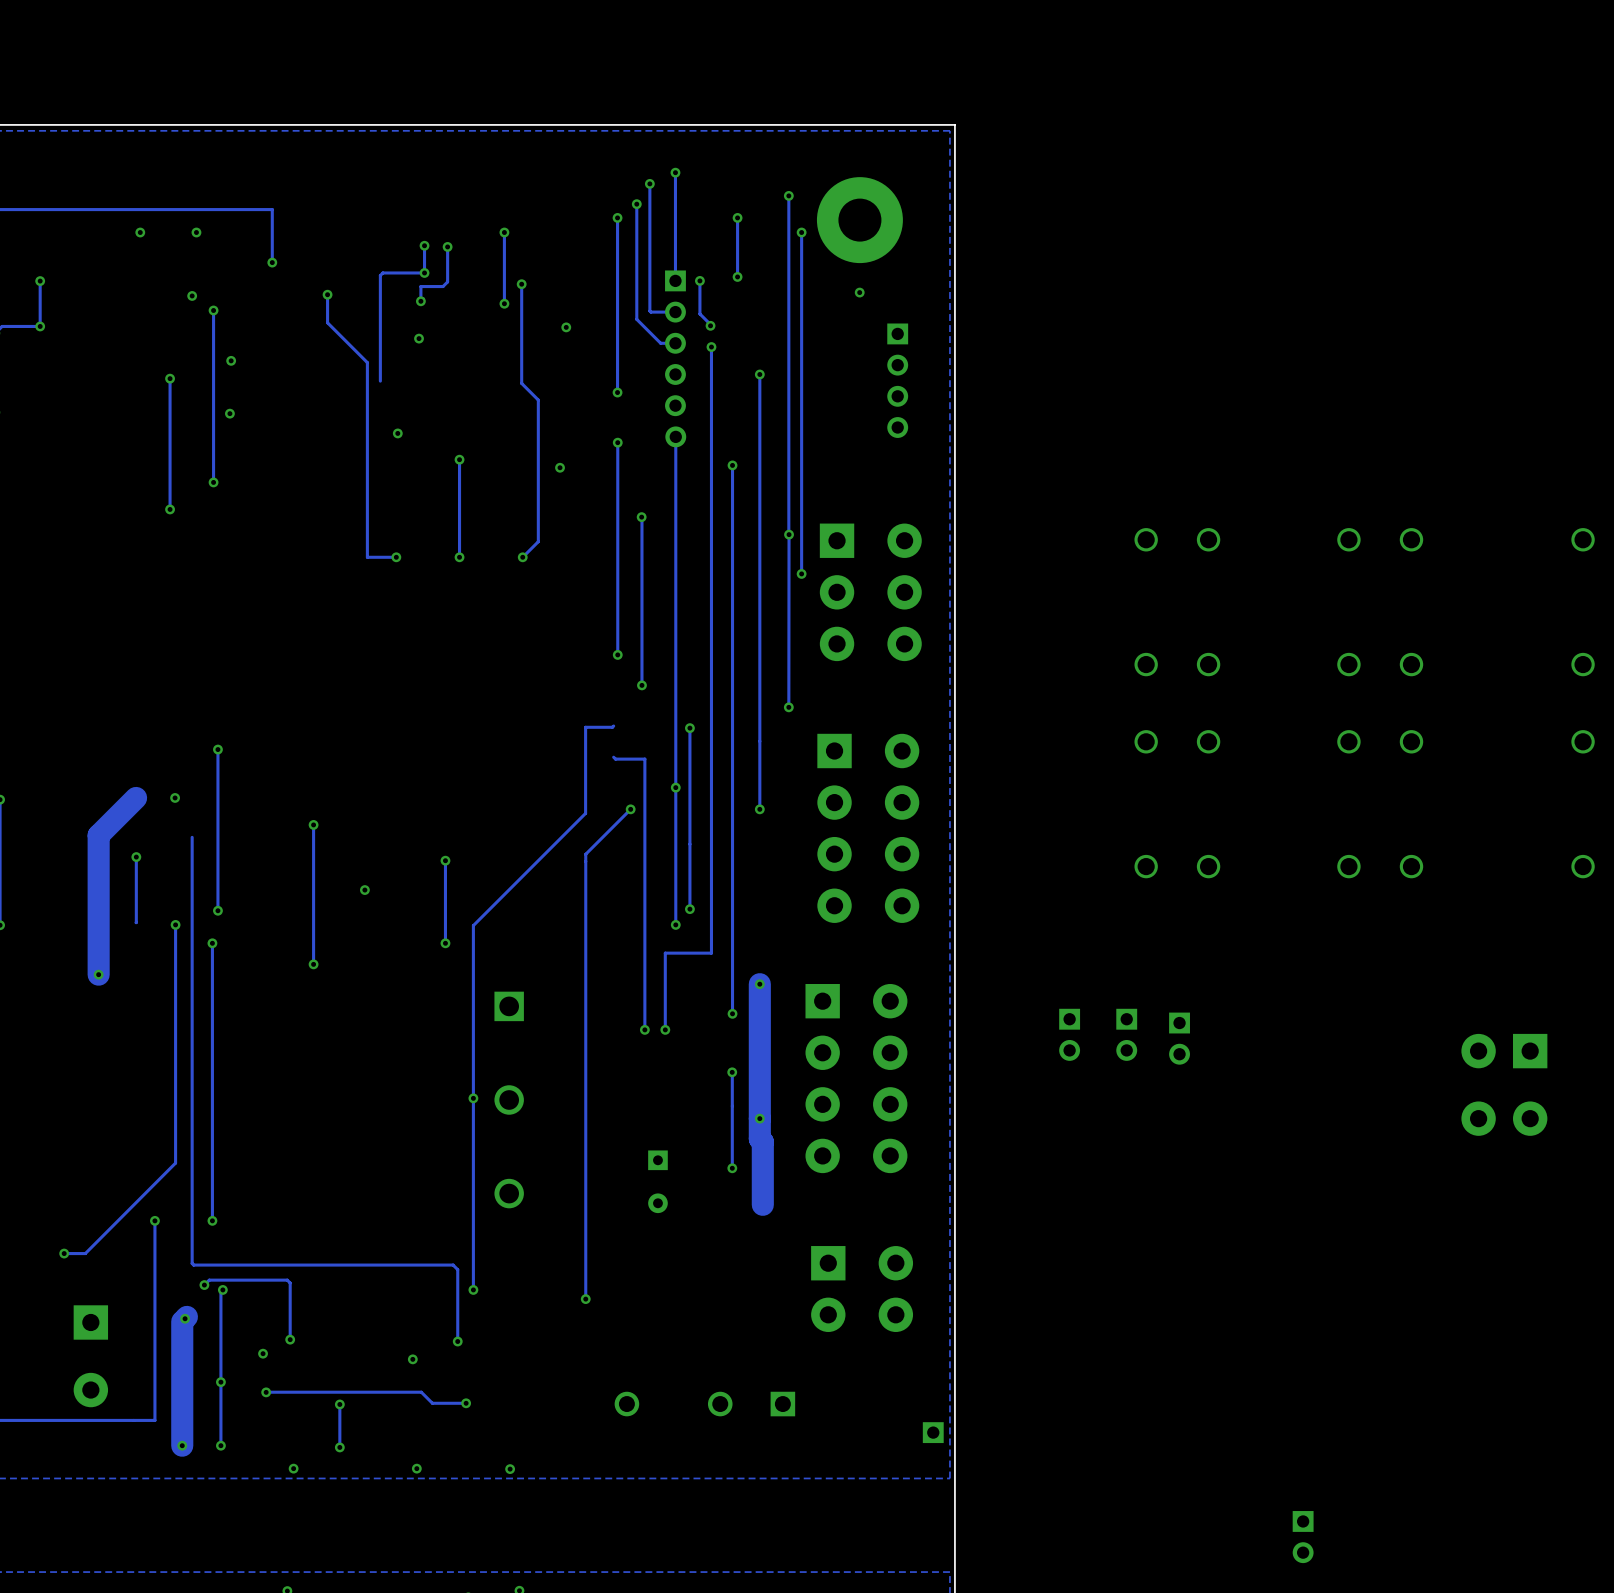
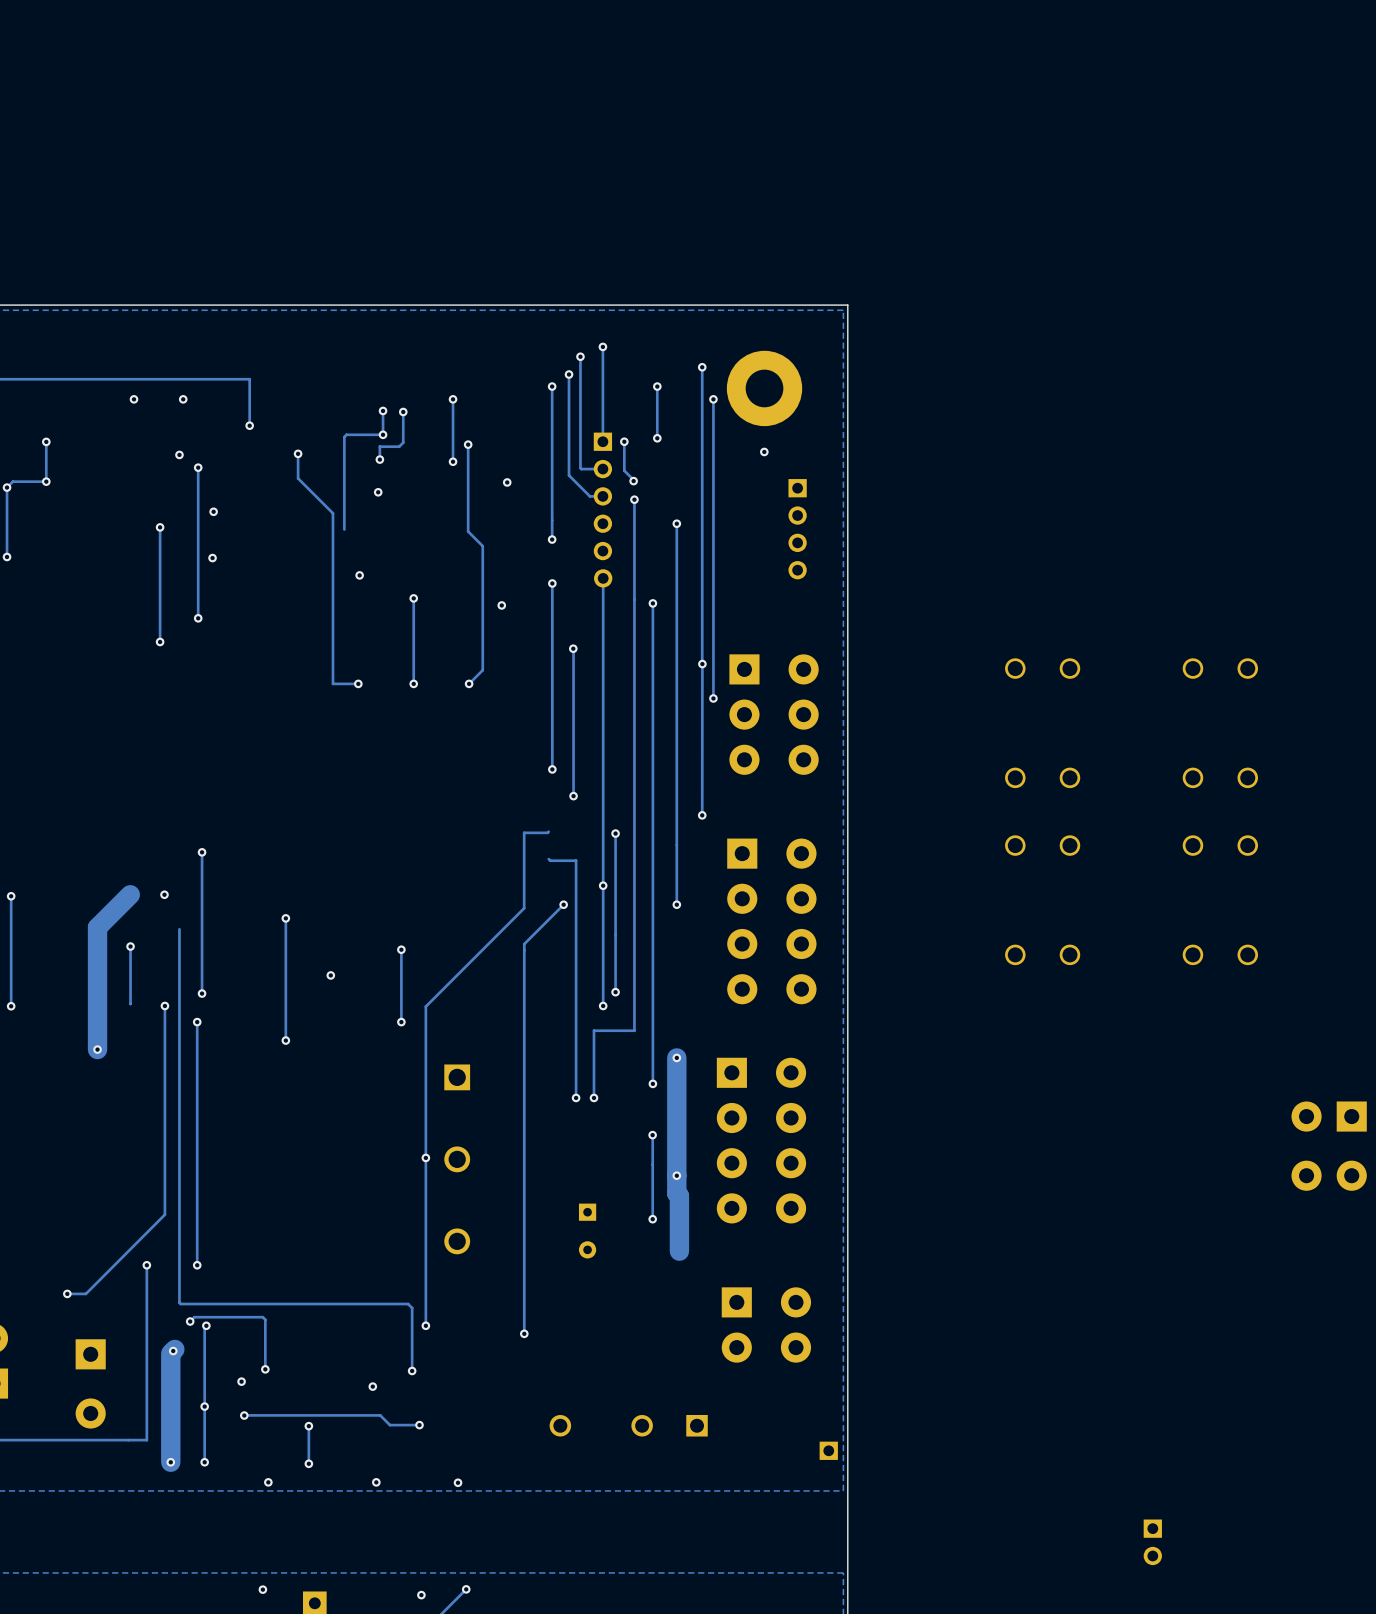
part: (1069, 1034) -> none
part: (1126, 1034) -> none
part: (1179, 1038) -> none

